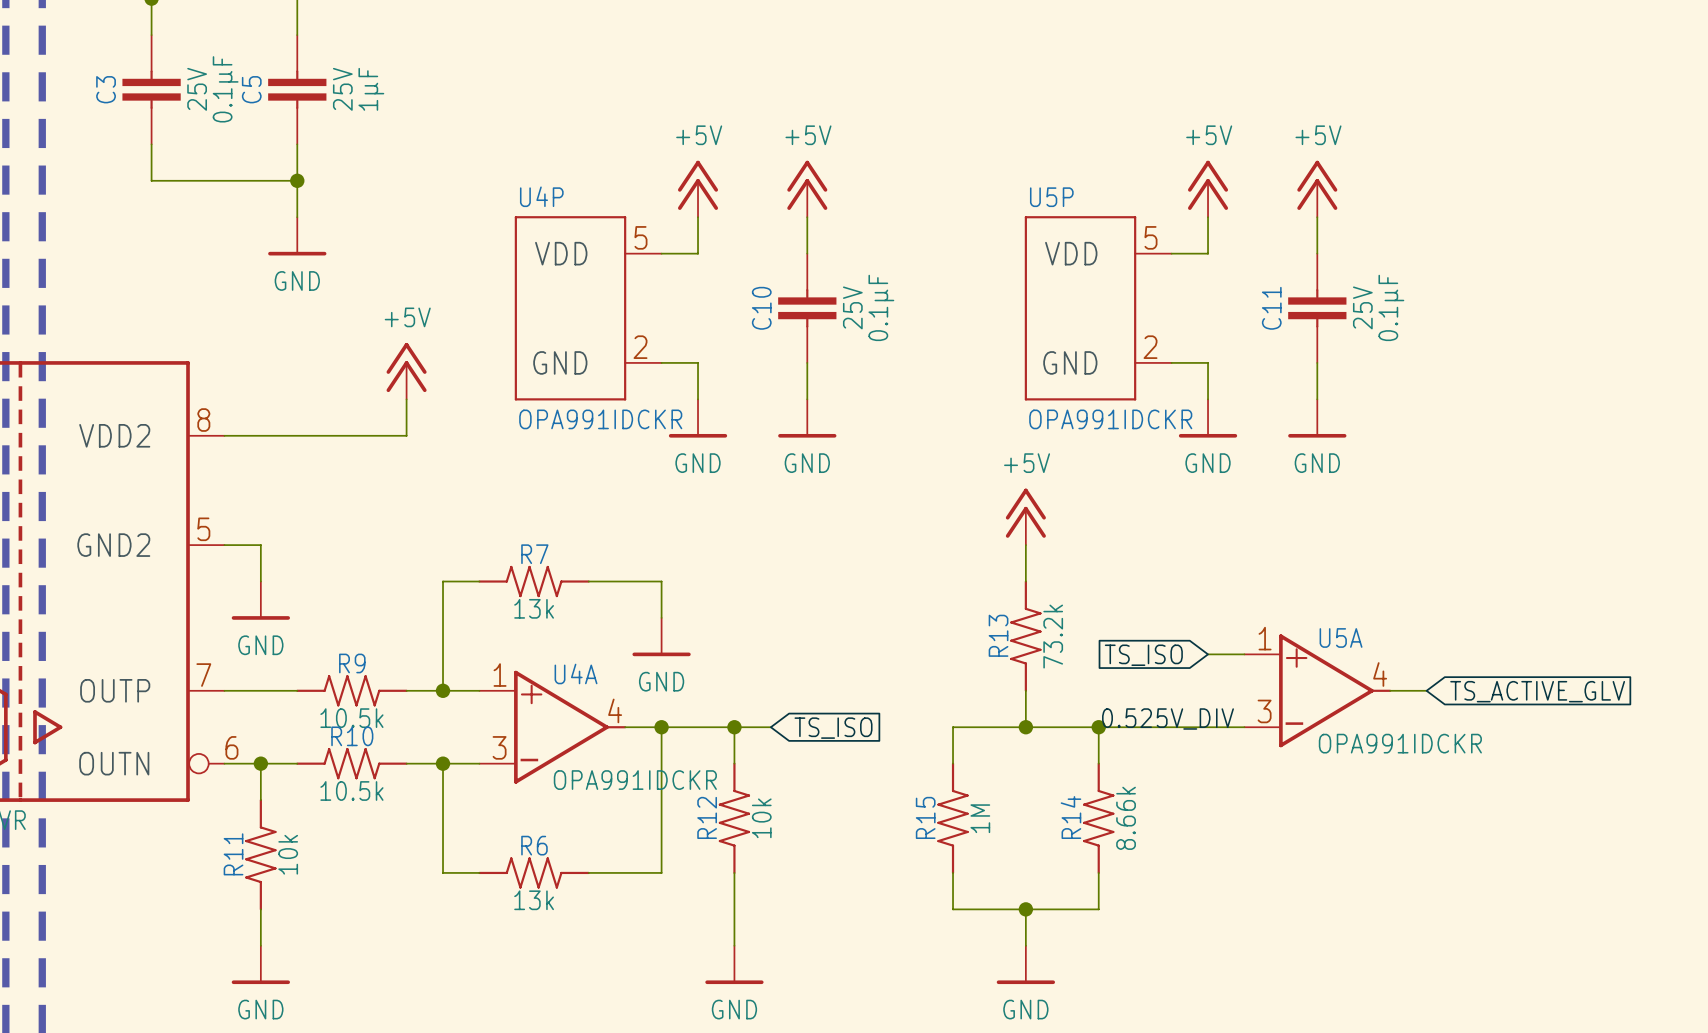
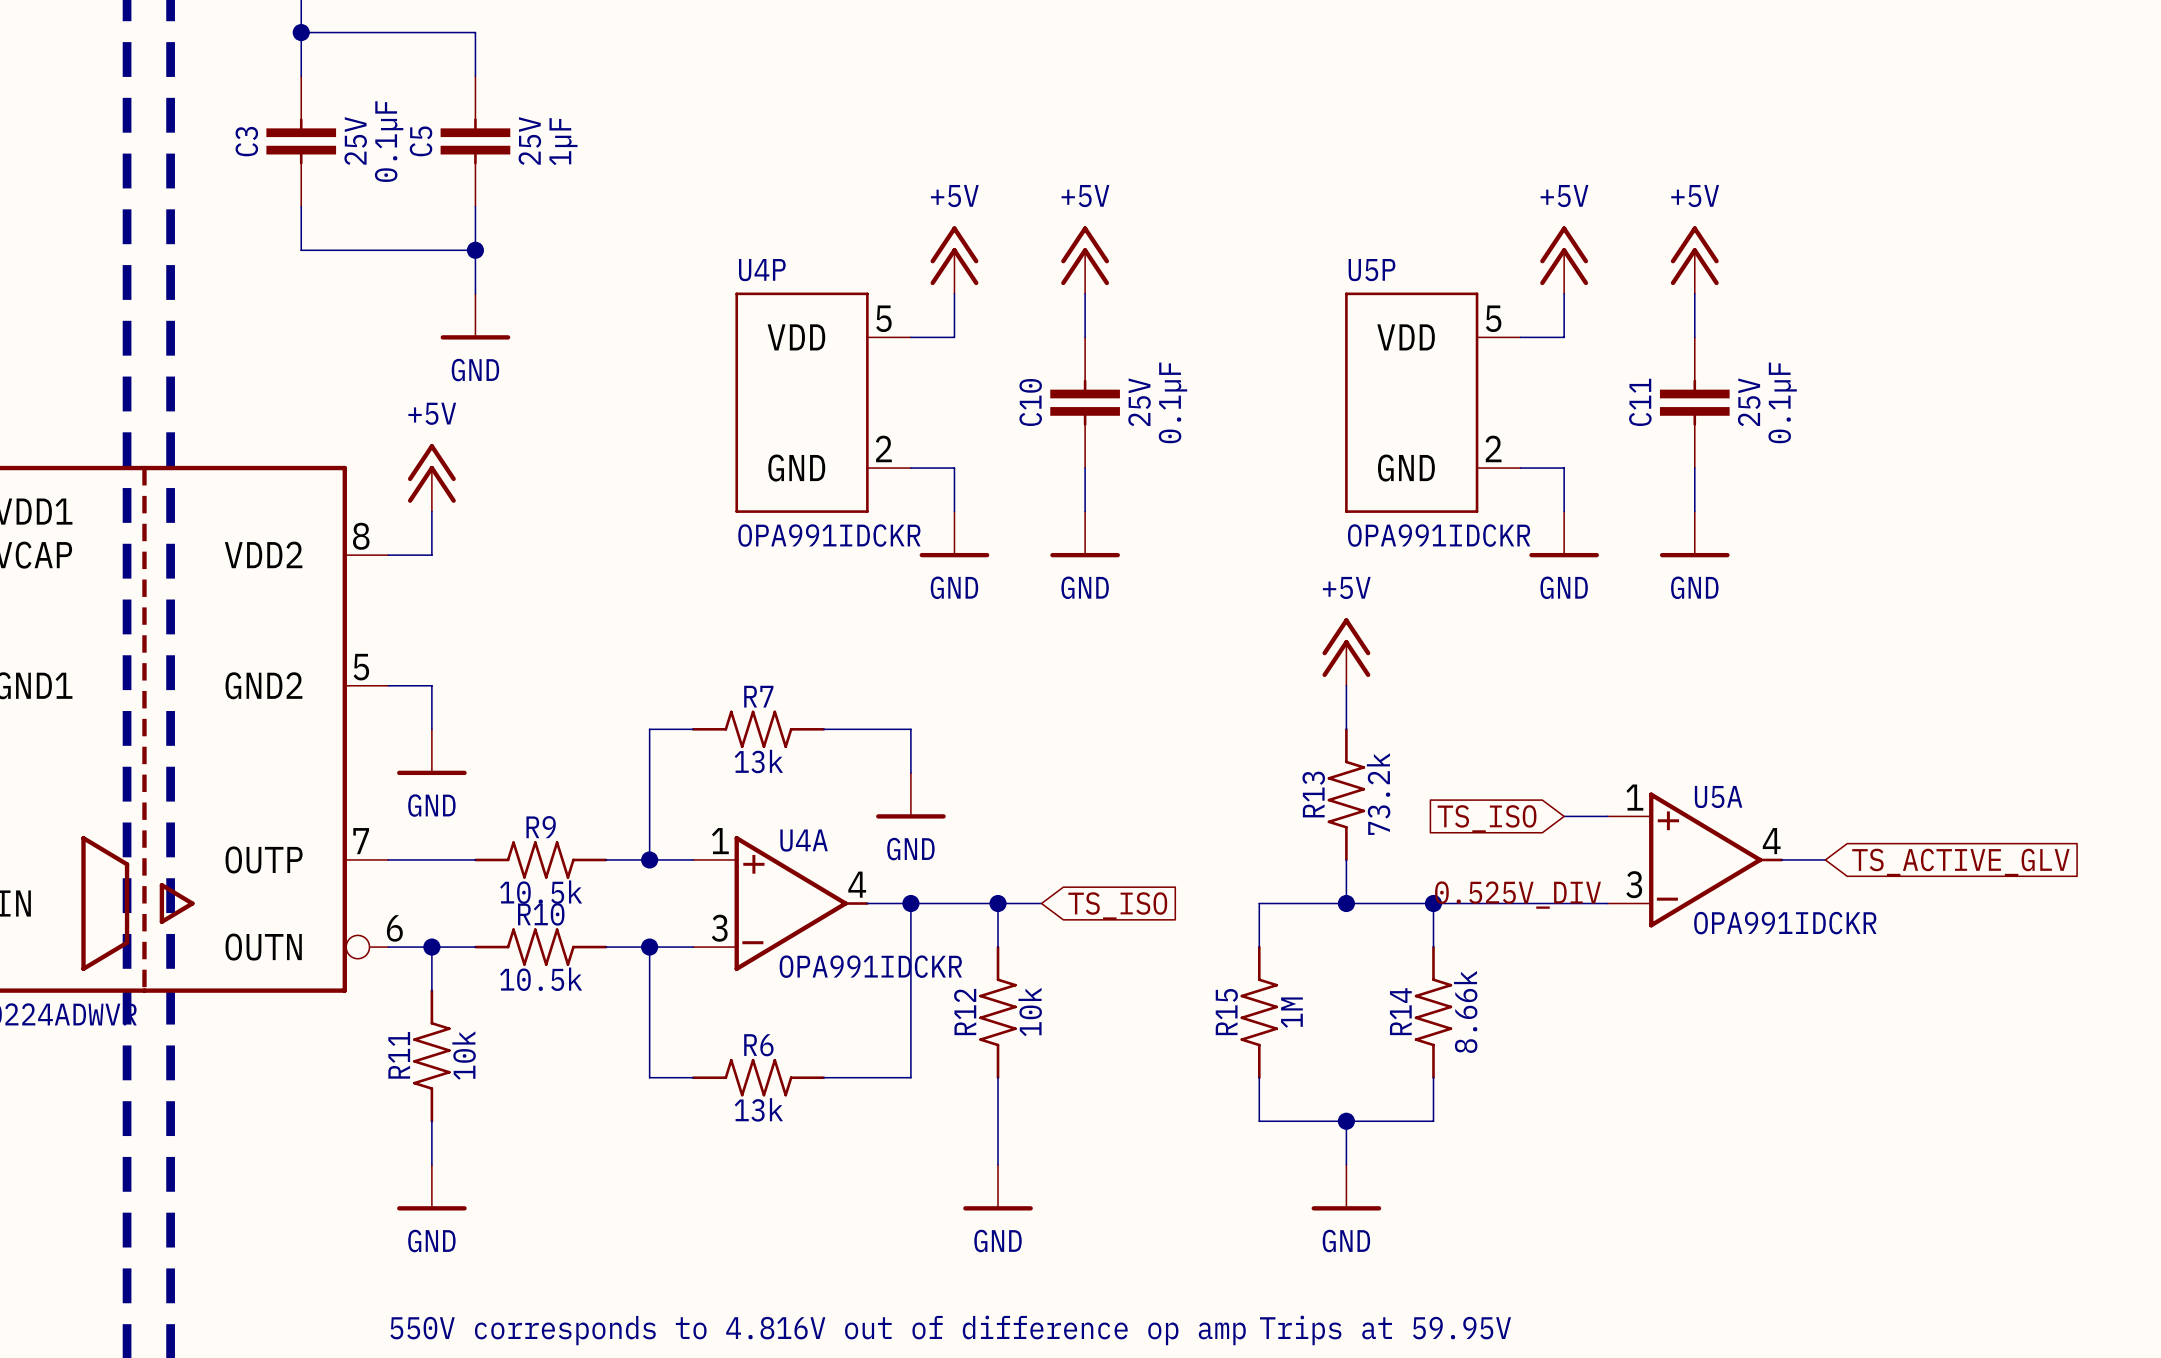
power symbol position: +5V (406, 371) -> +5V (431, 477)
wire: (406, 399) (406, 435) (260, 435) -> (431, 511) (431, 555)

